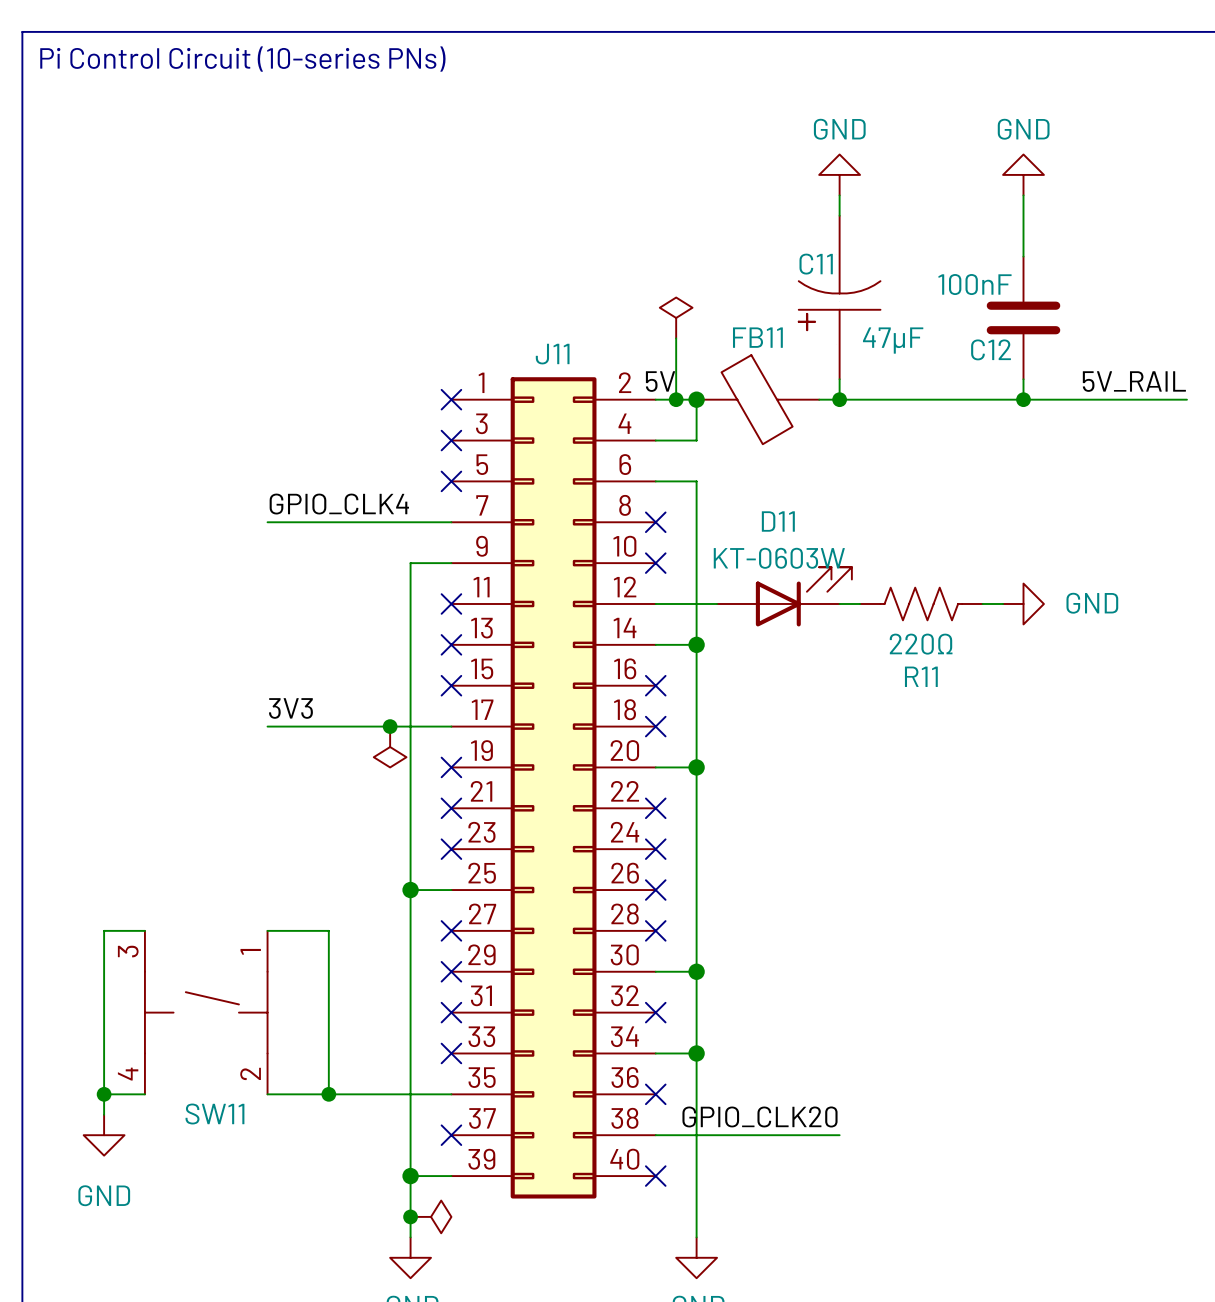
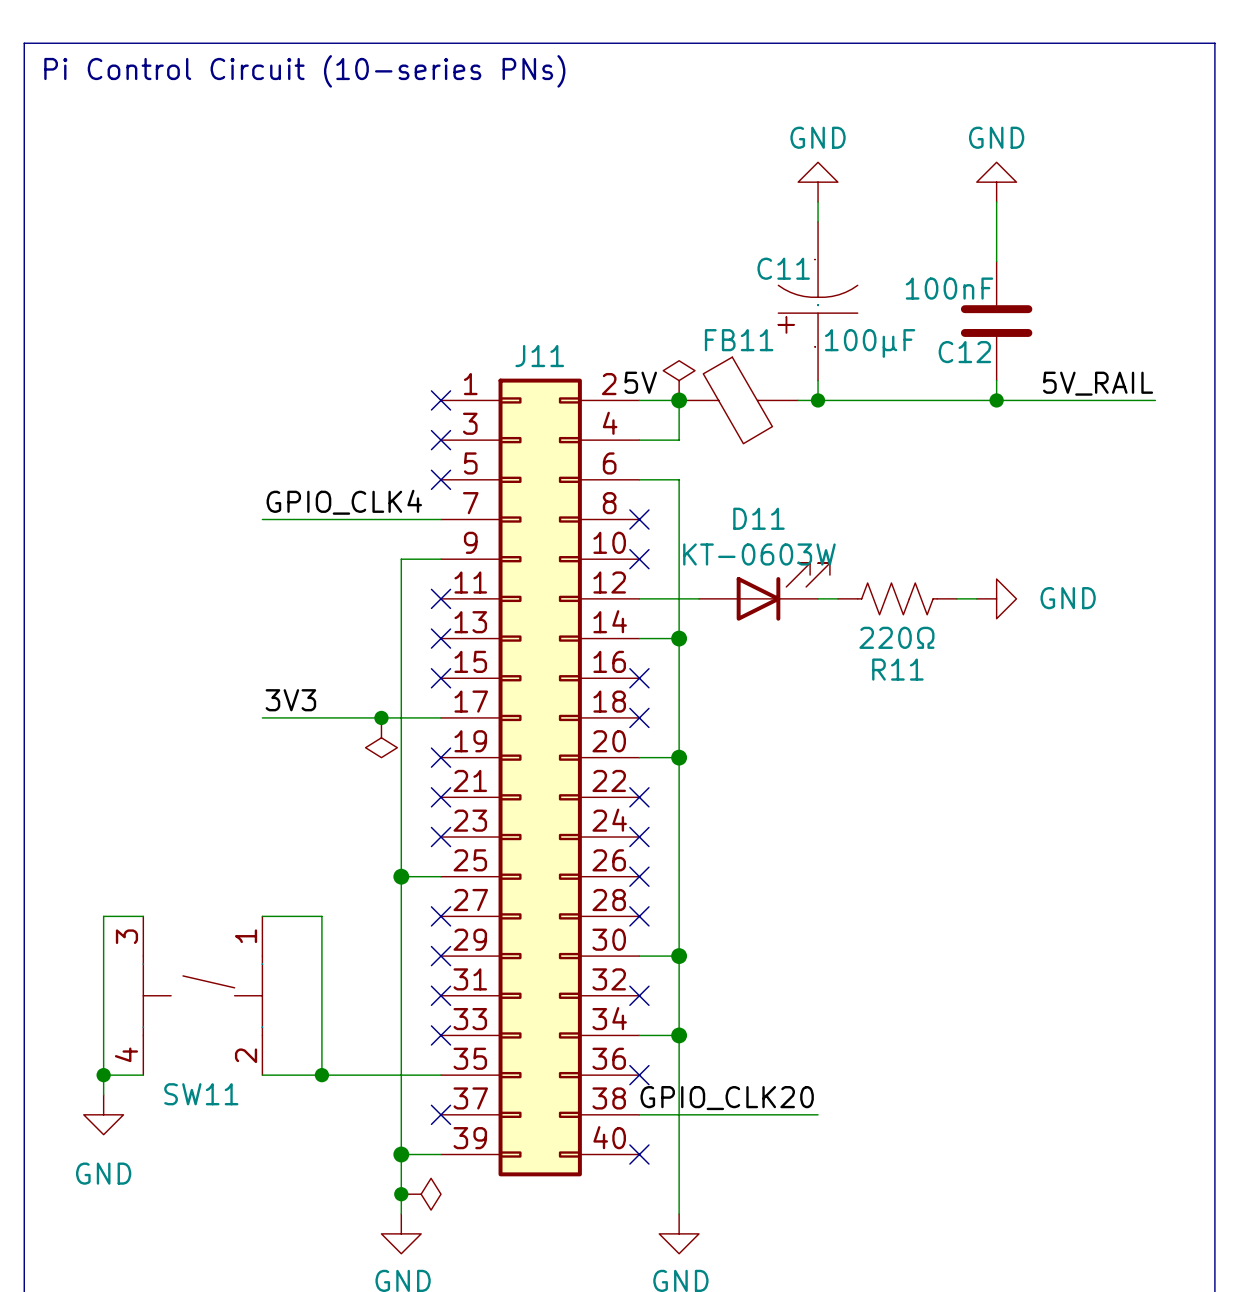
power symbol position: (676, 317) -> (679, 380)
wire: (676, 338) (676, 399) -> none
C11 value: 47µF (893, 340) -> 100µF (870, 343)
junction: (676, 399) -> none

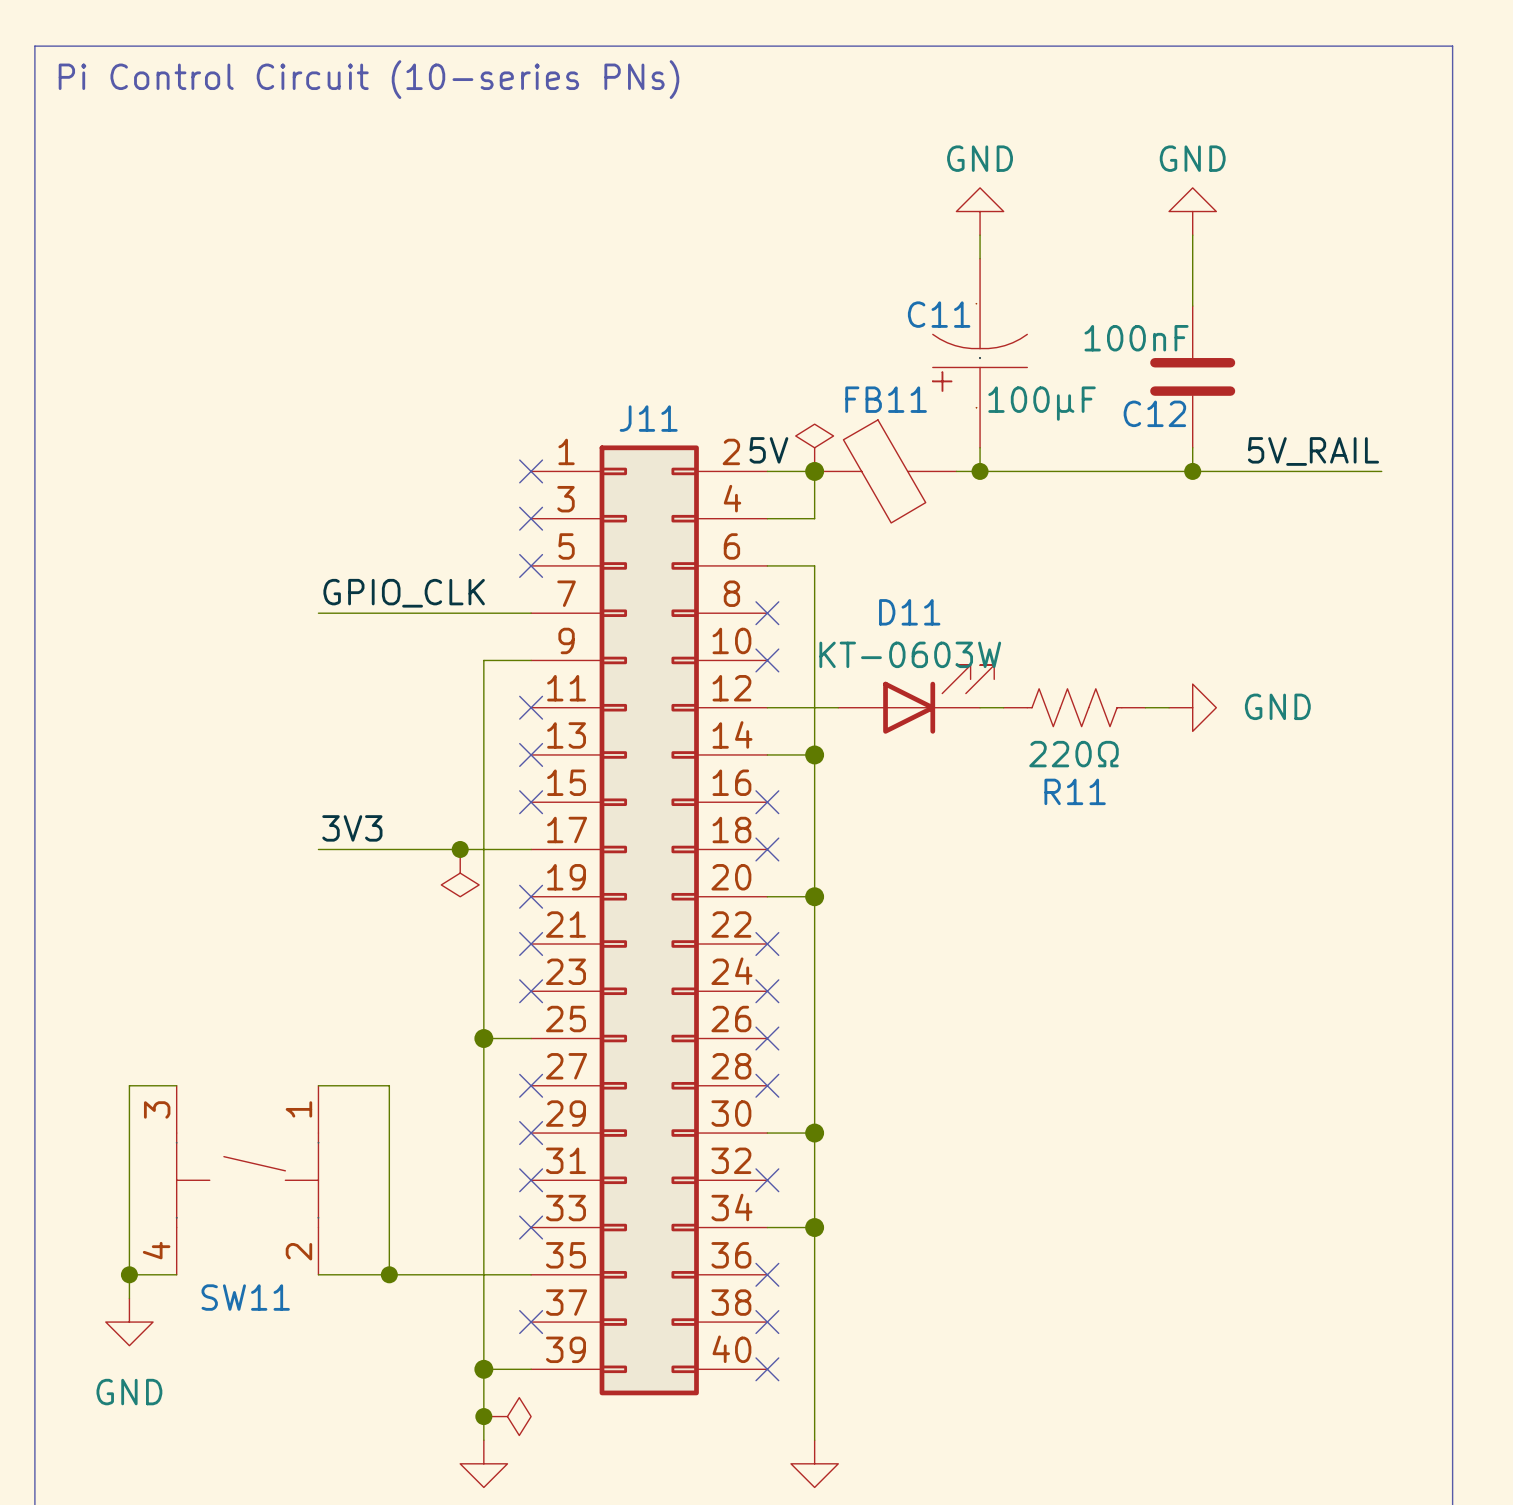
label: GPIO_CLK4 (344, 502) -> GPIO_CLK (404, 593)
label: GPIO_CLK20 (727, 1098) -> none
wire: (639, 1114) (818, 1114) -> none
no-connect mark: none -> (767, 1322)

